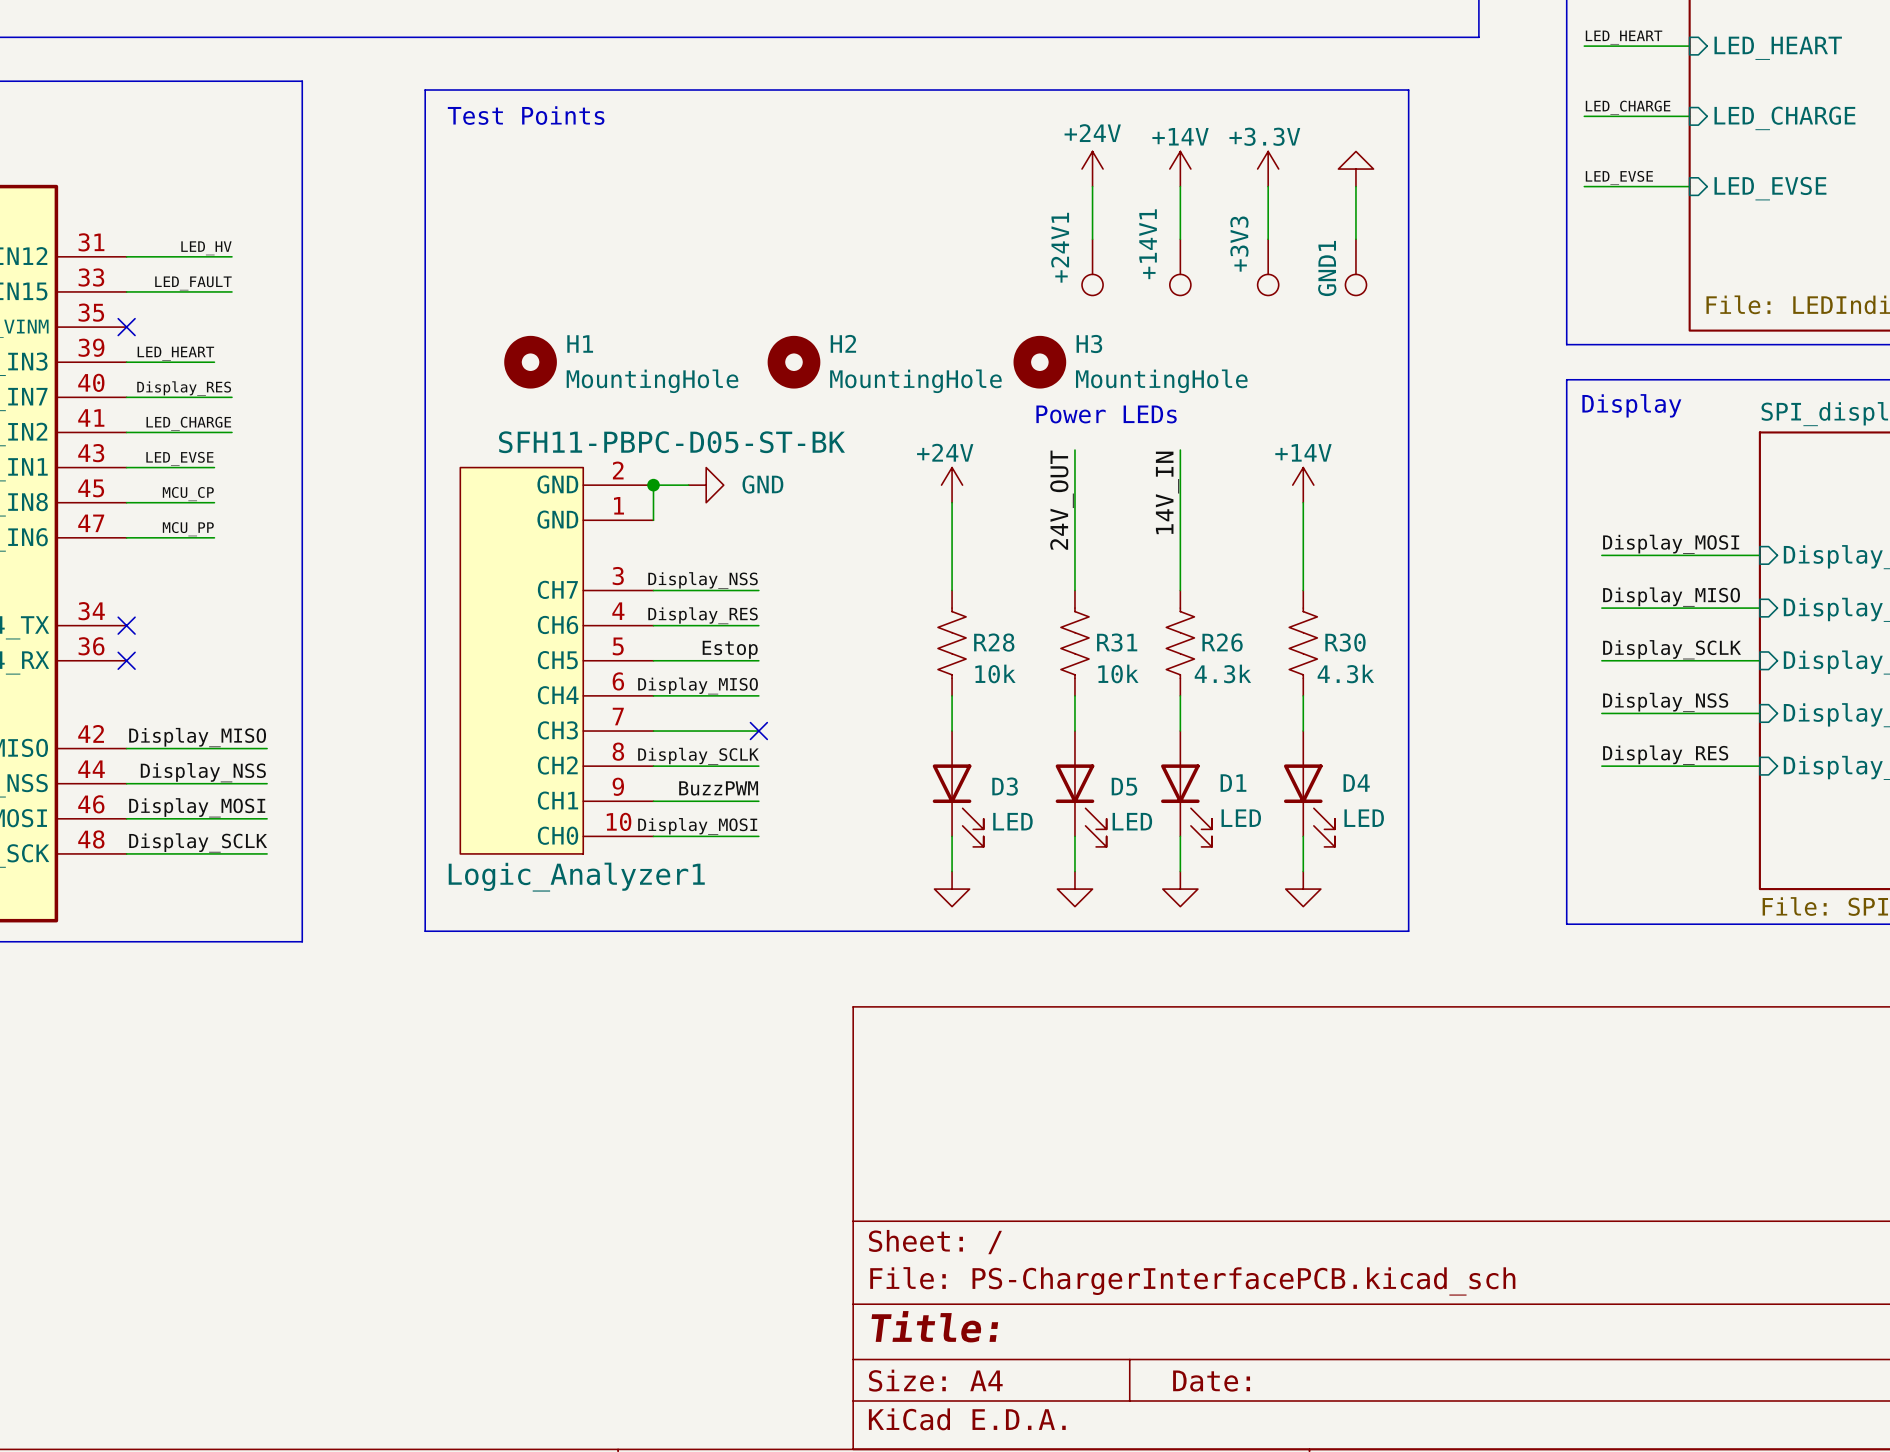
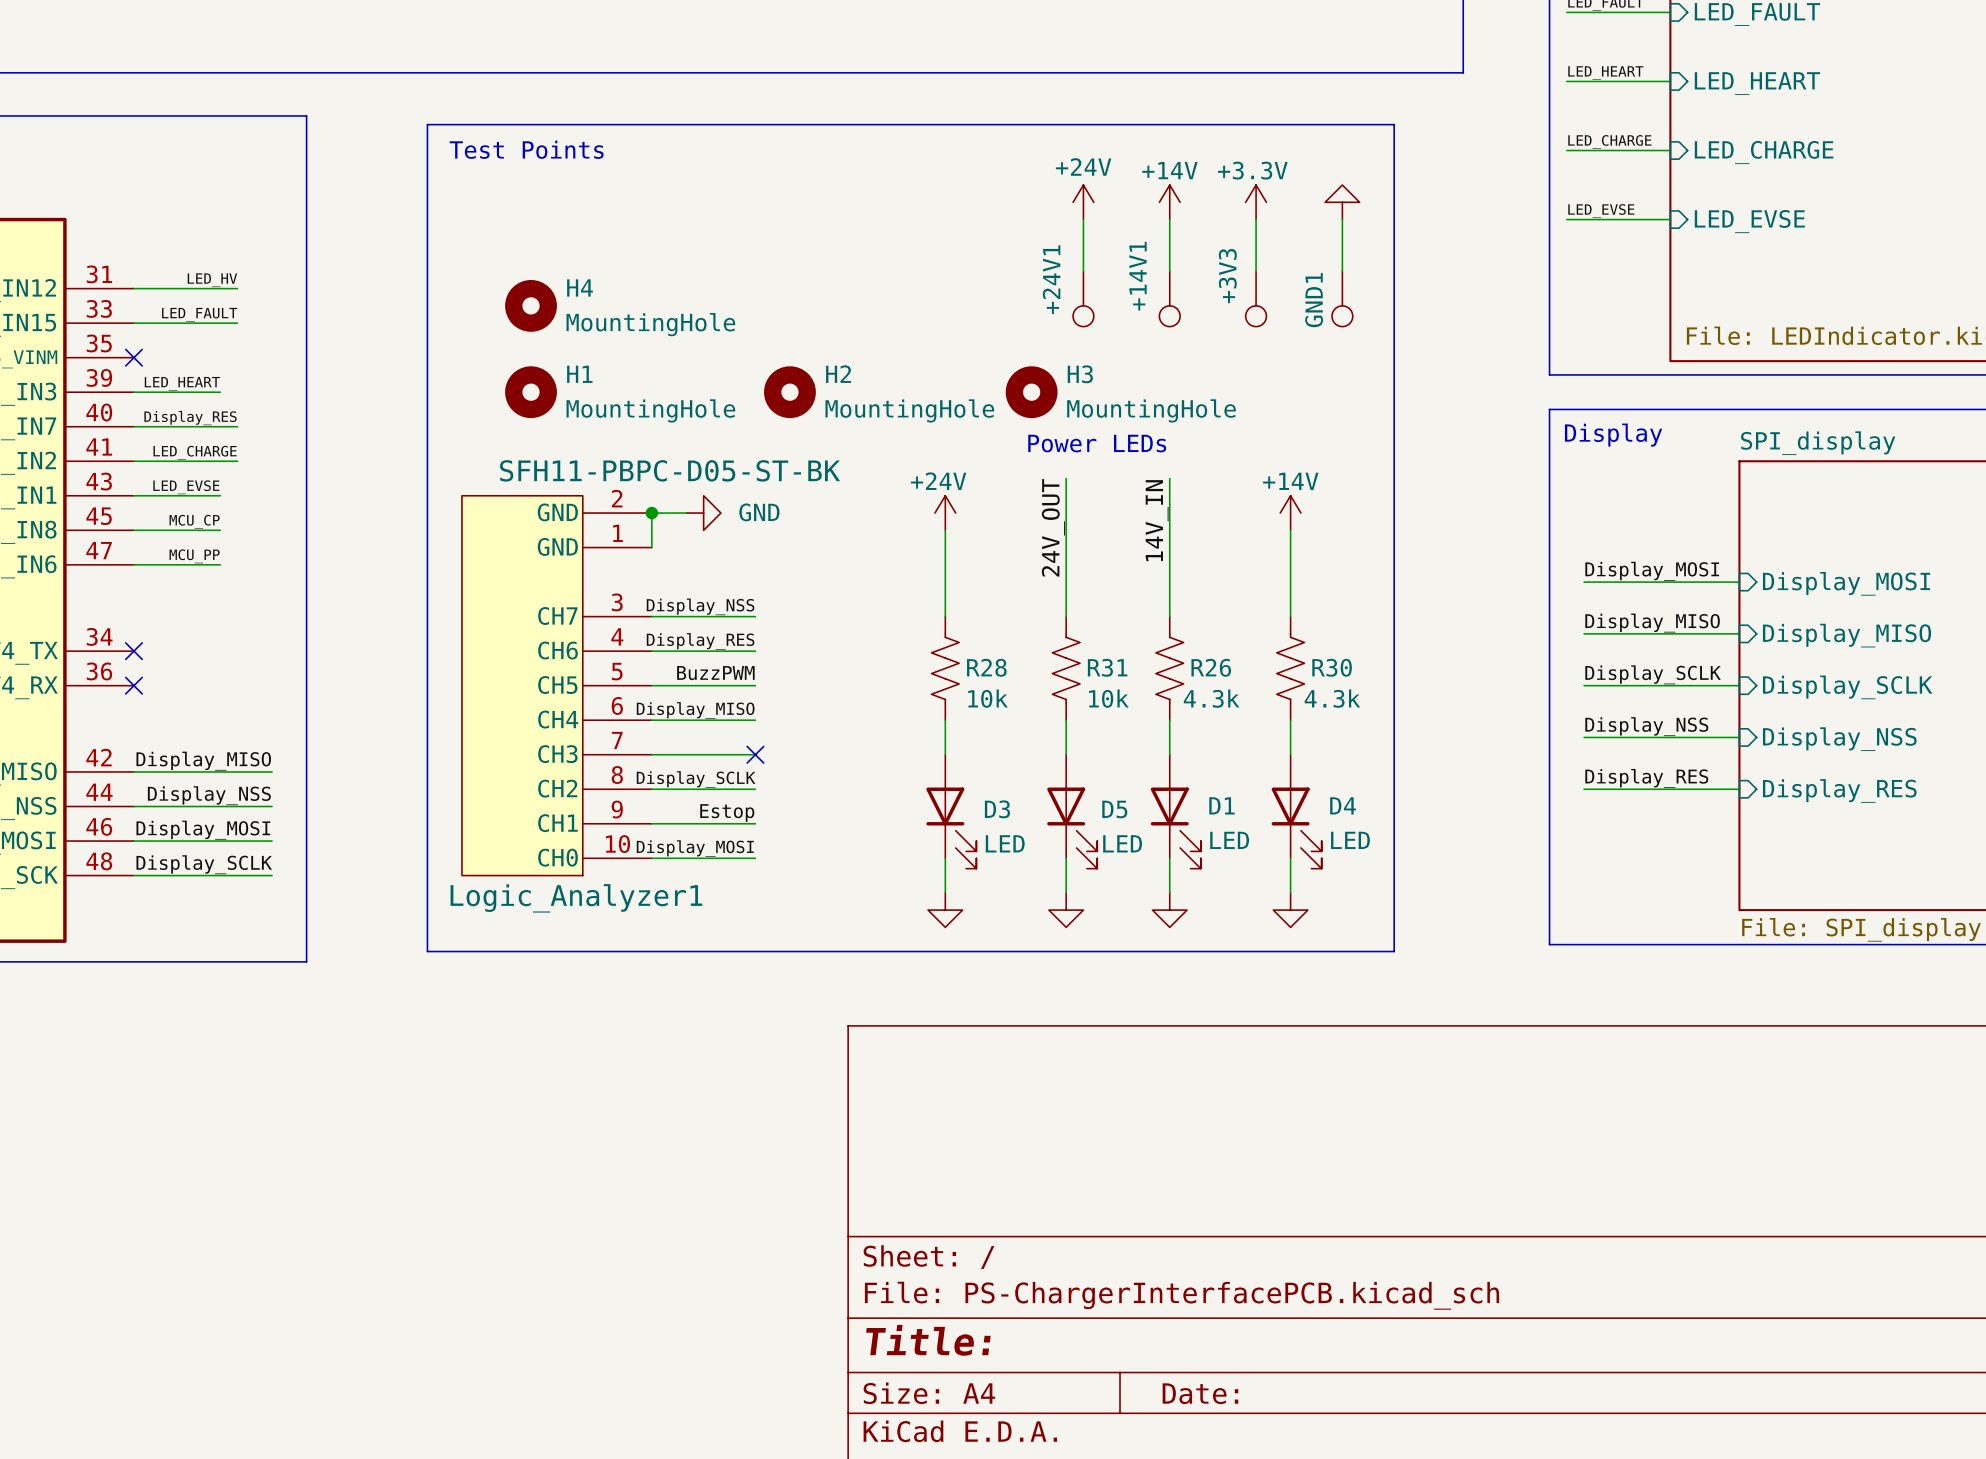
H4: none -> MountingHole (531, 305)
label: Estop (730, 649) -> BuzzPWM (715, 673)
label: BuzzPWM (718, 788) -> Estop (727, 813)

